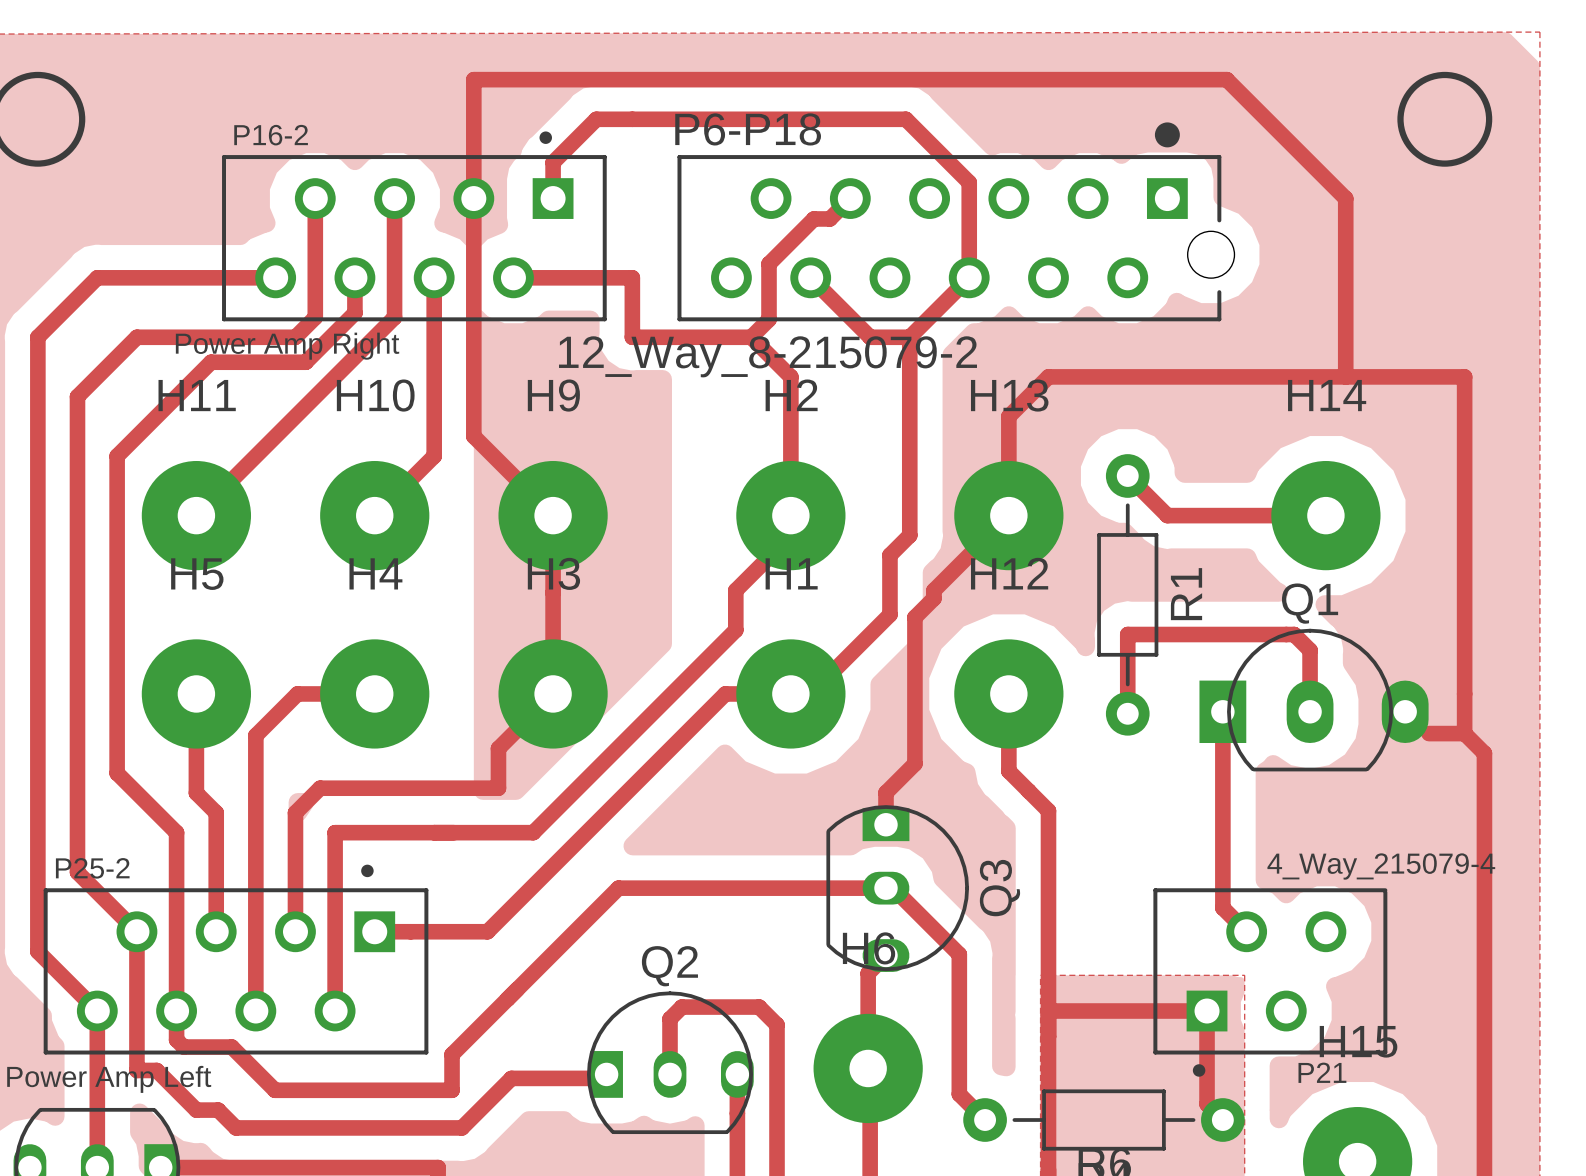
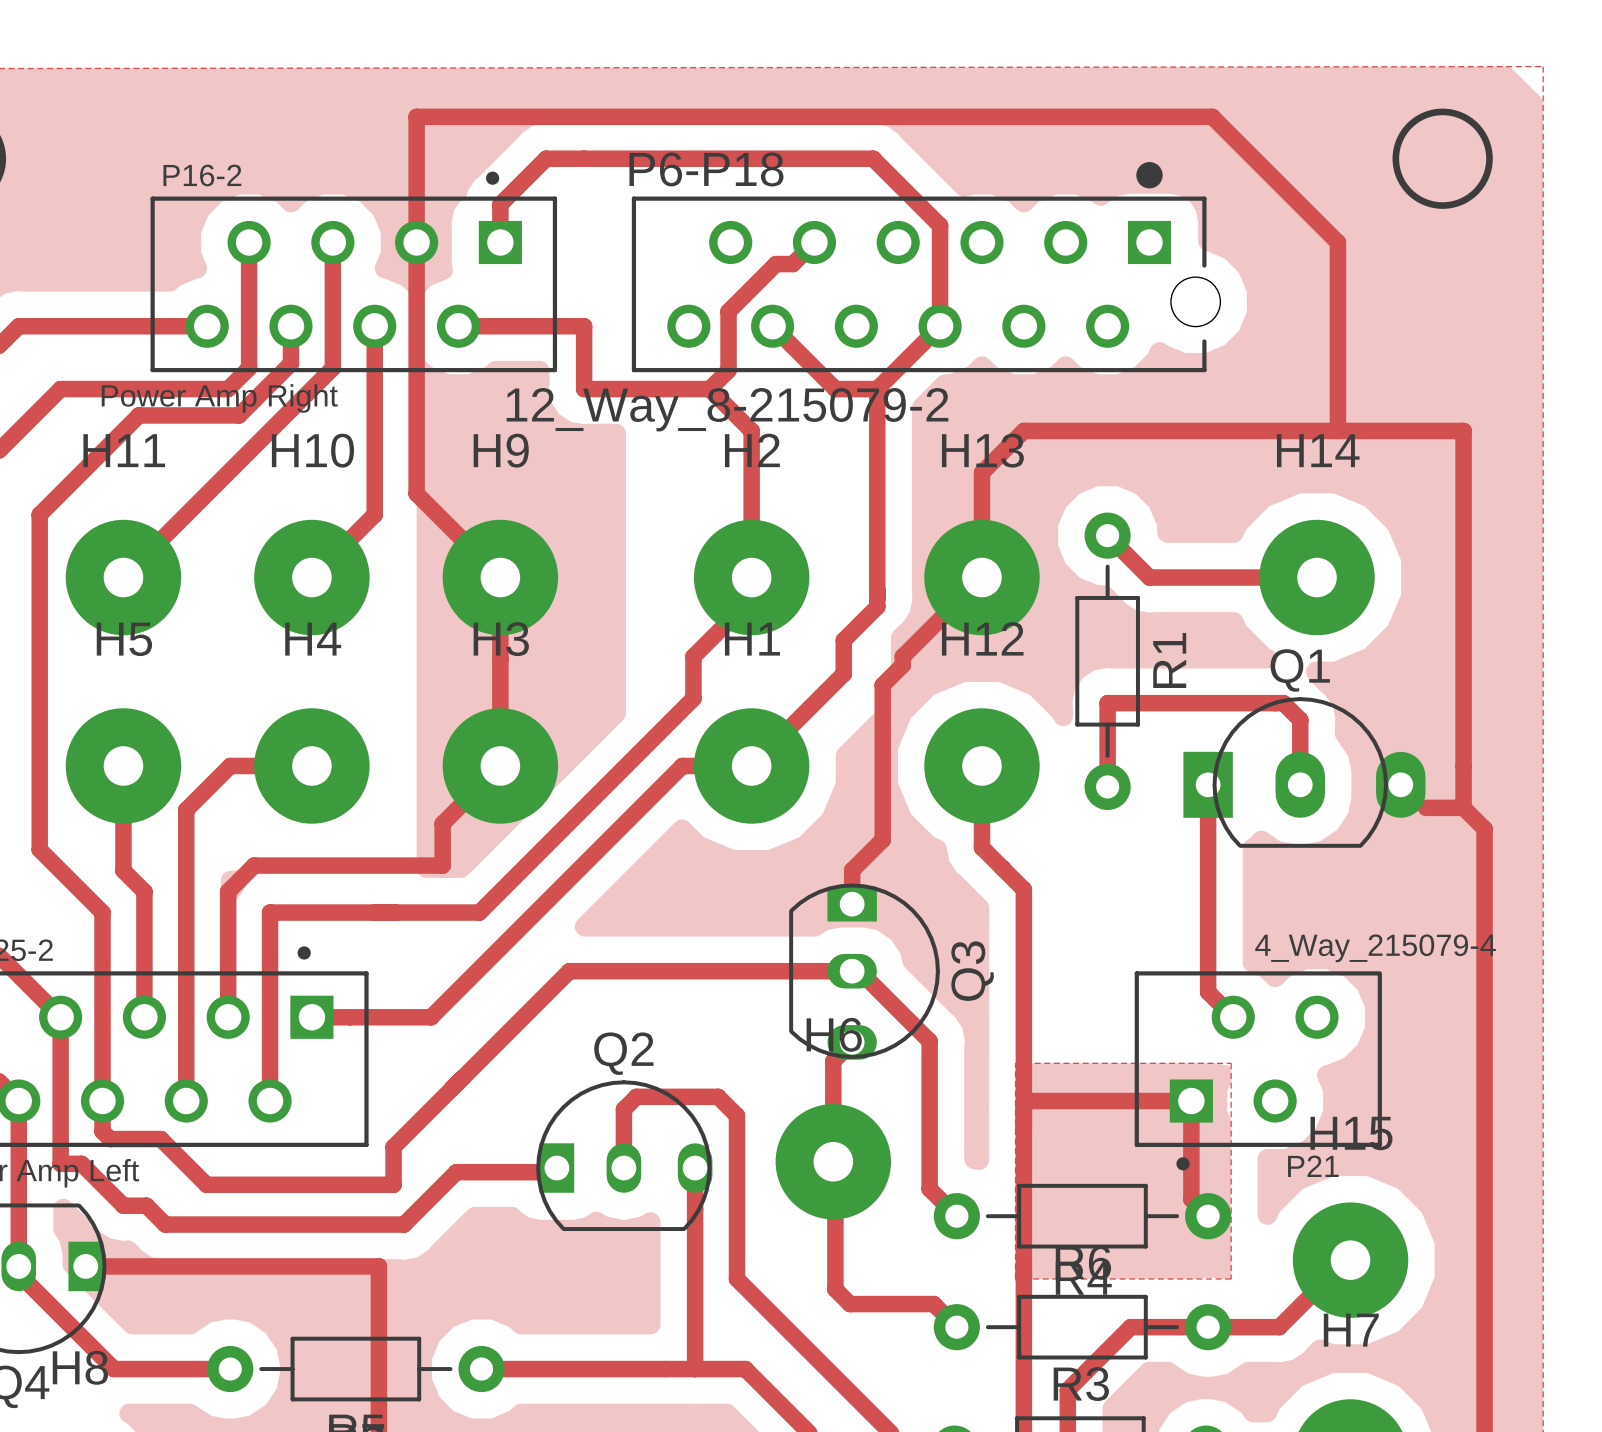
top track: (909, 535) (889, 555) (889, 614) (810, 693) -> (877, 598) (877, 606) (843, 640) (843, 673) (751, 765)

